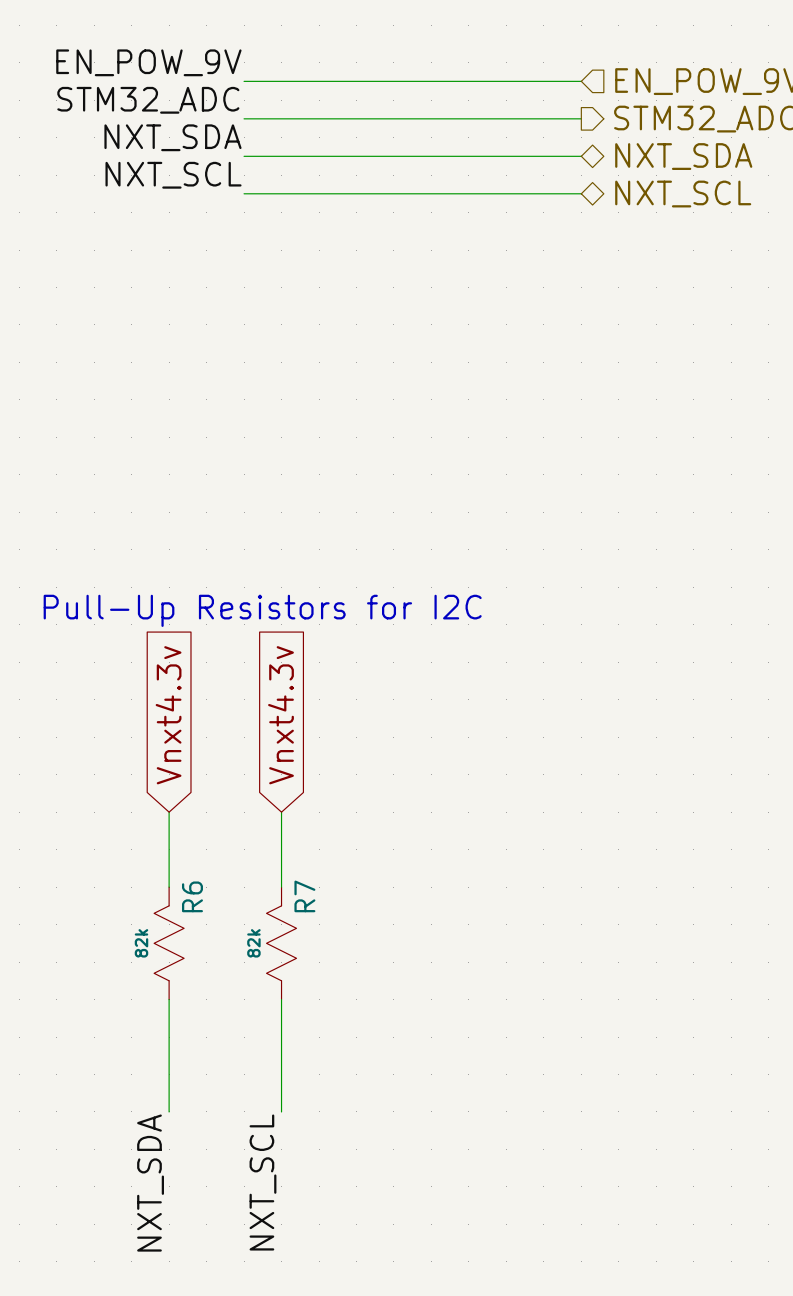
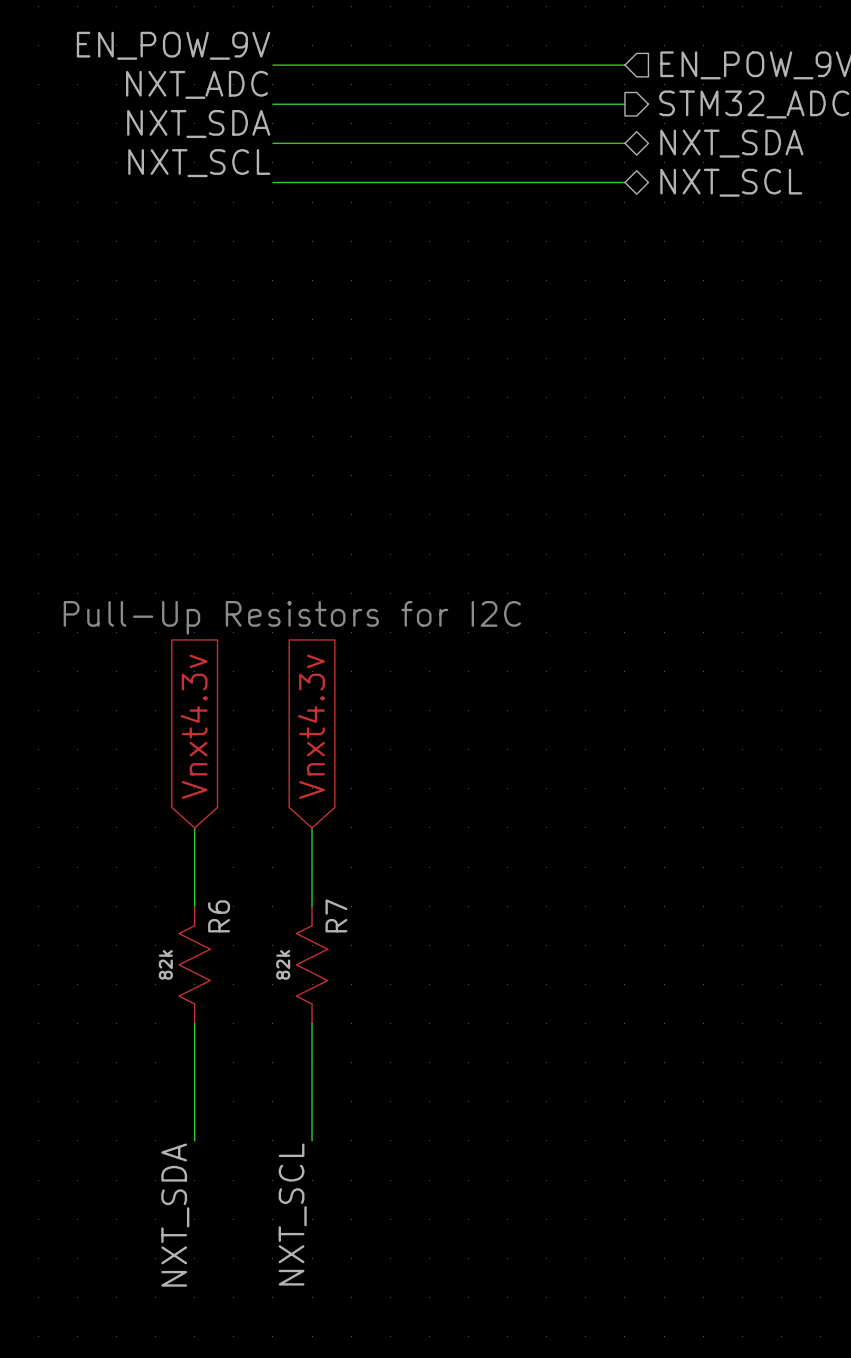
label: STM32_ADC (148, 100) -> NXT_ADC (197, 84)

